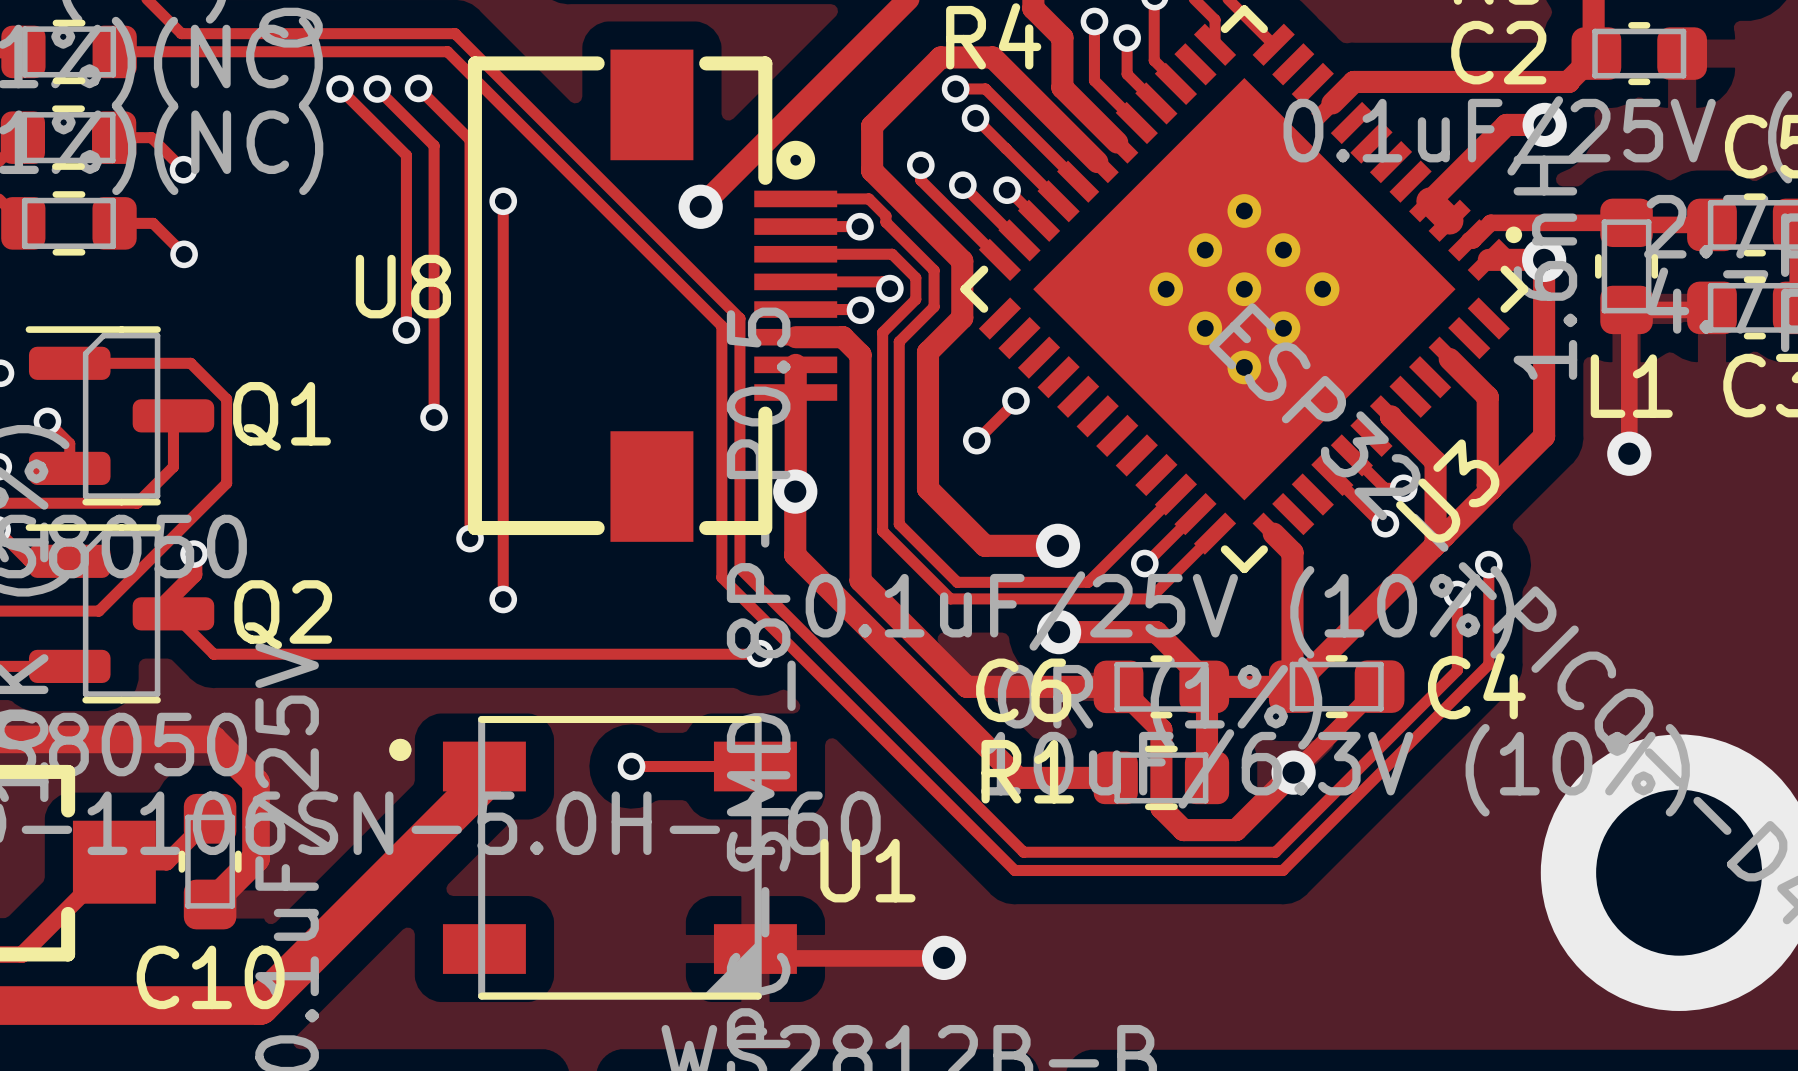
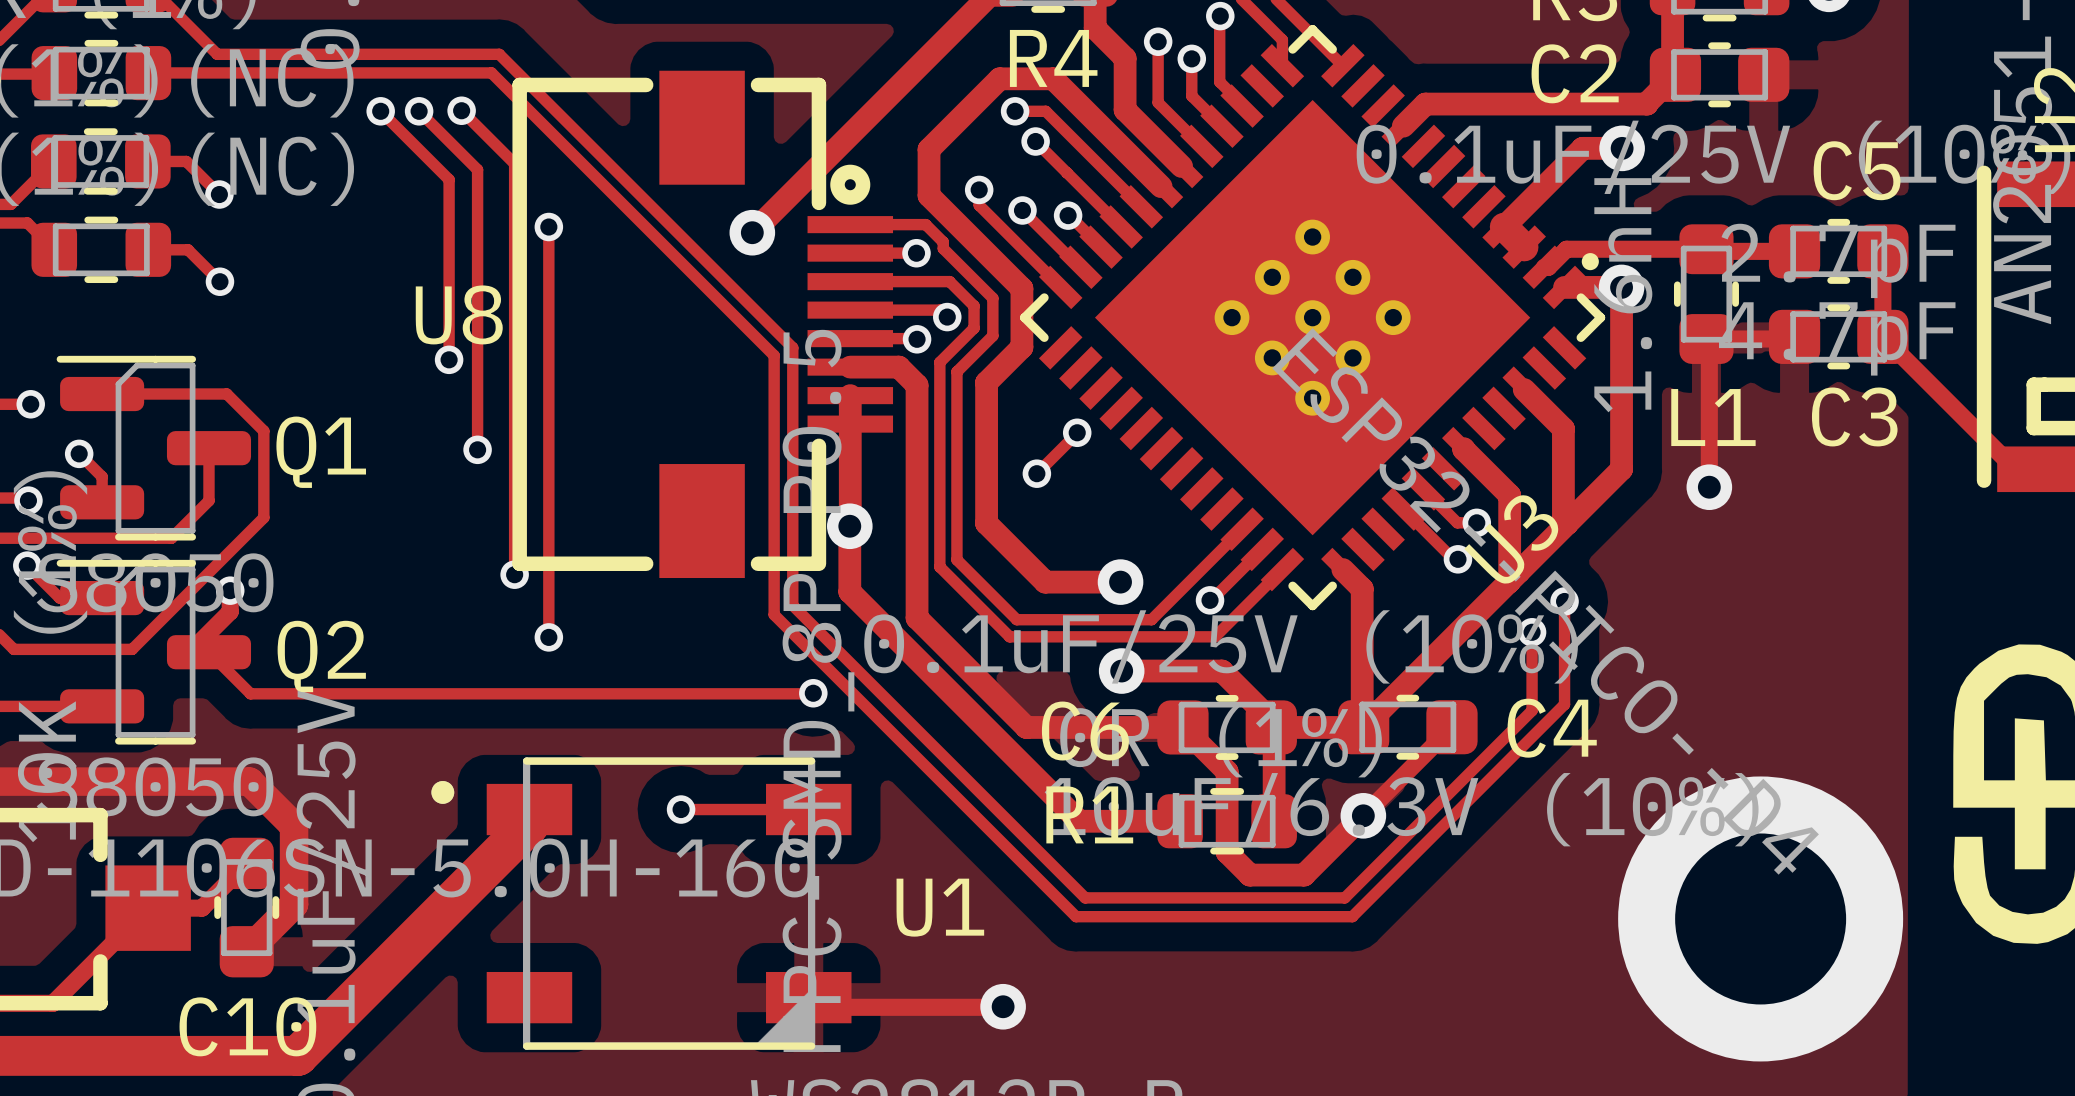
U1 name position: U1 (867, 870) -> U1 (940, 907)

